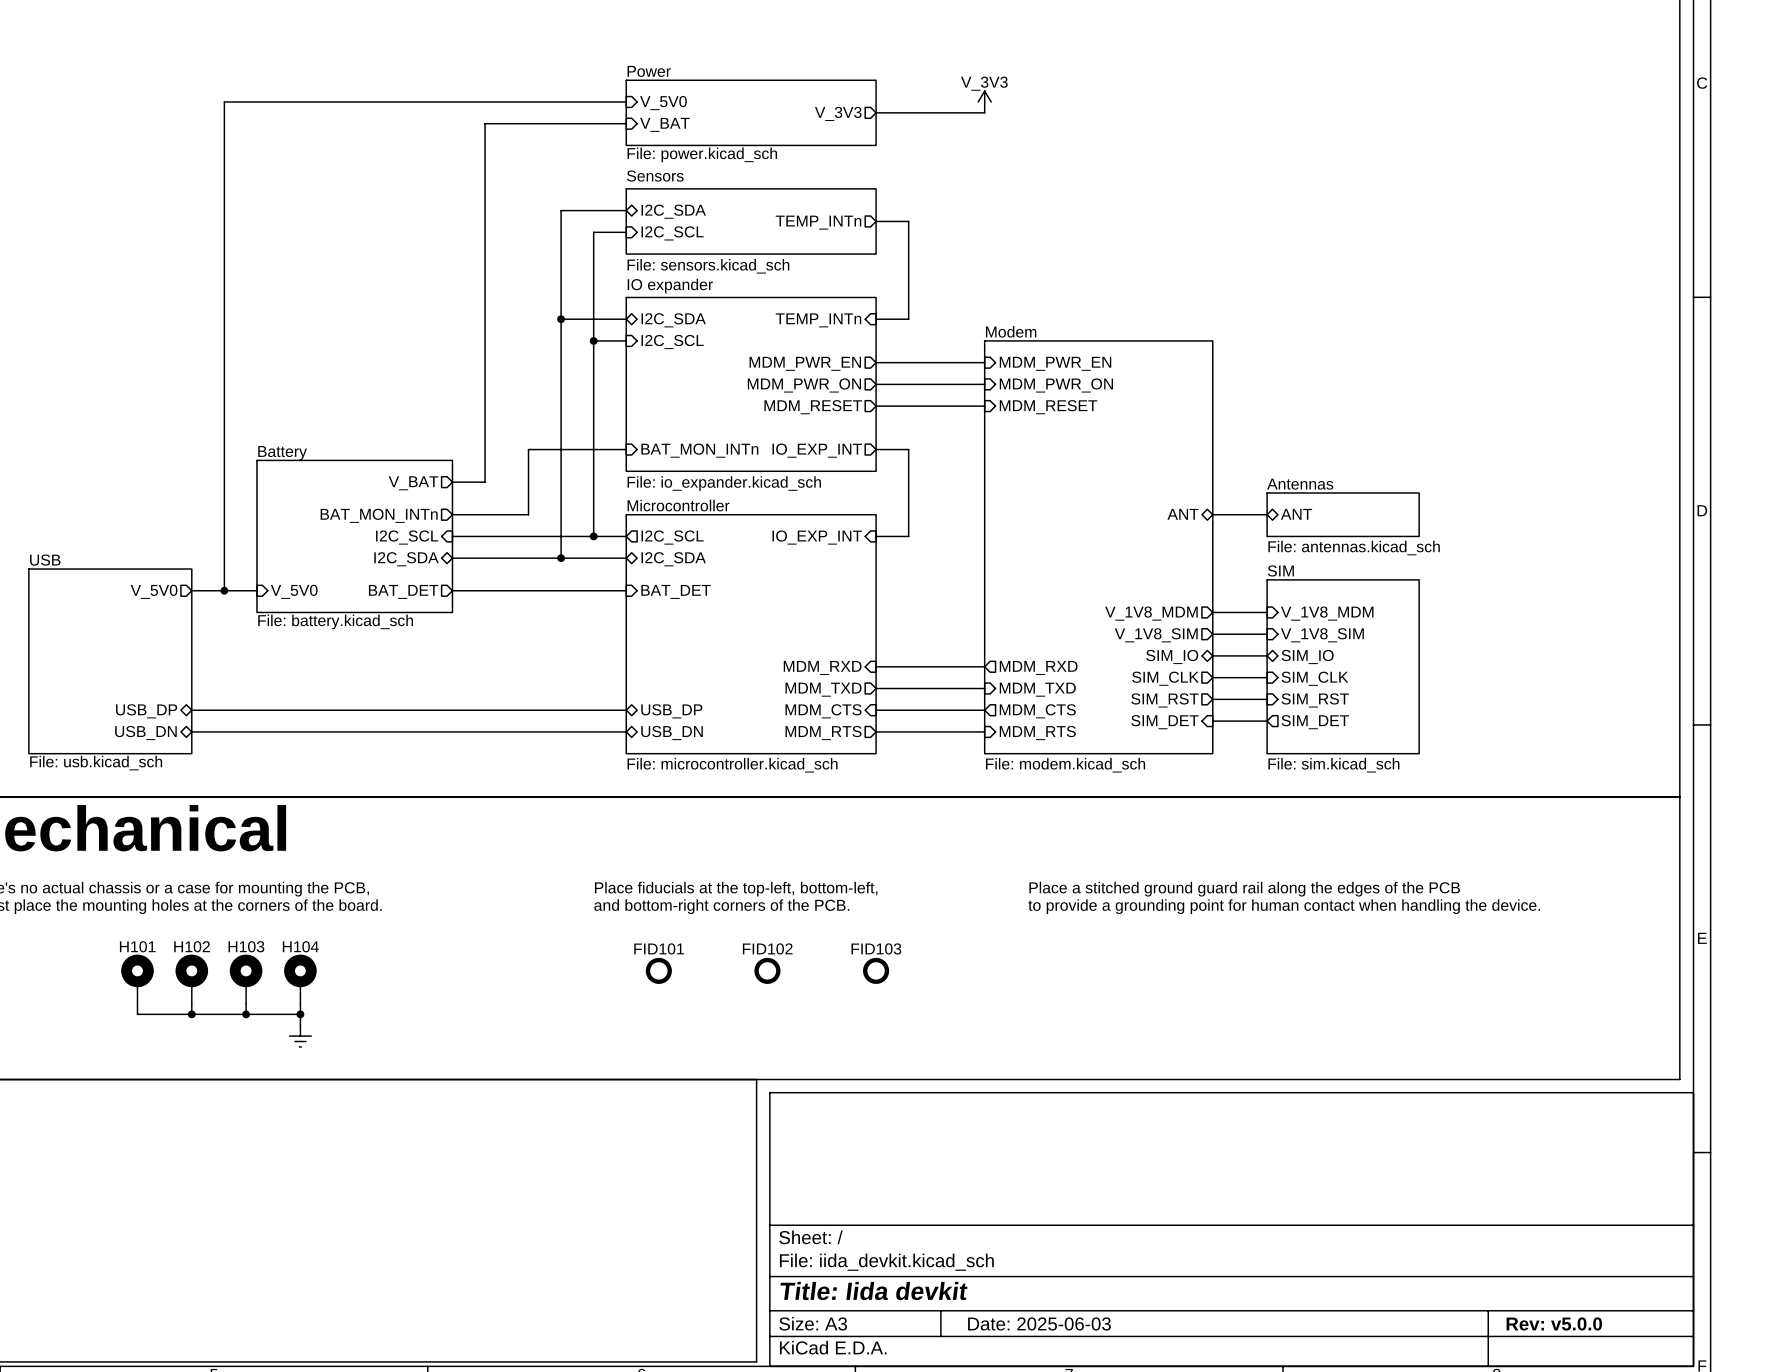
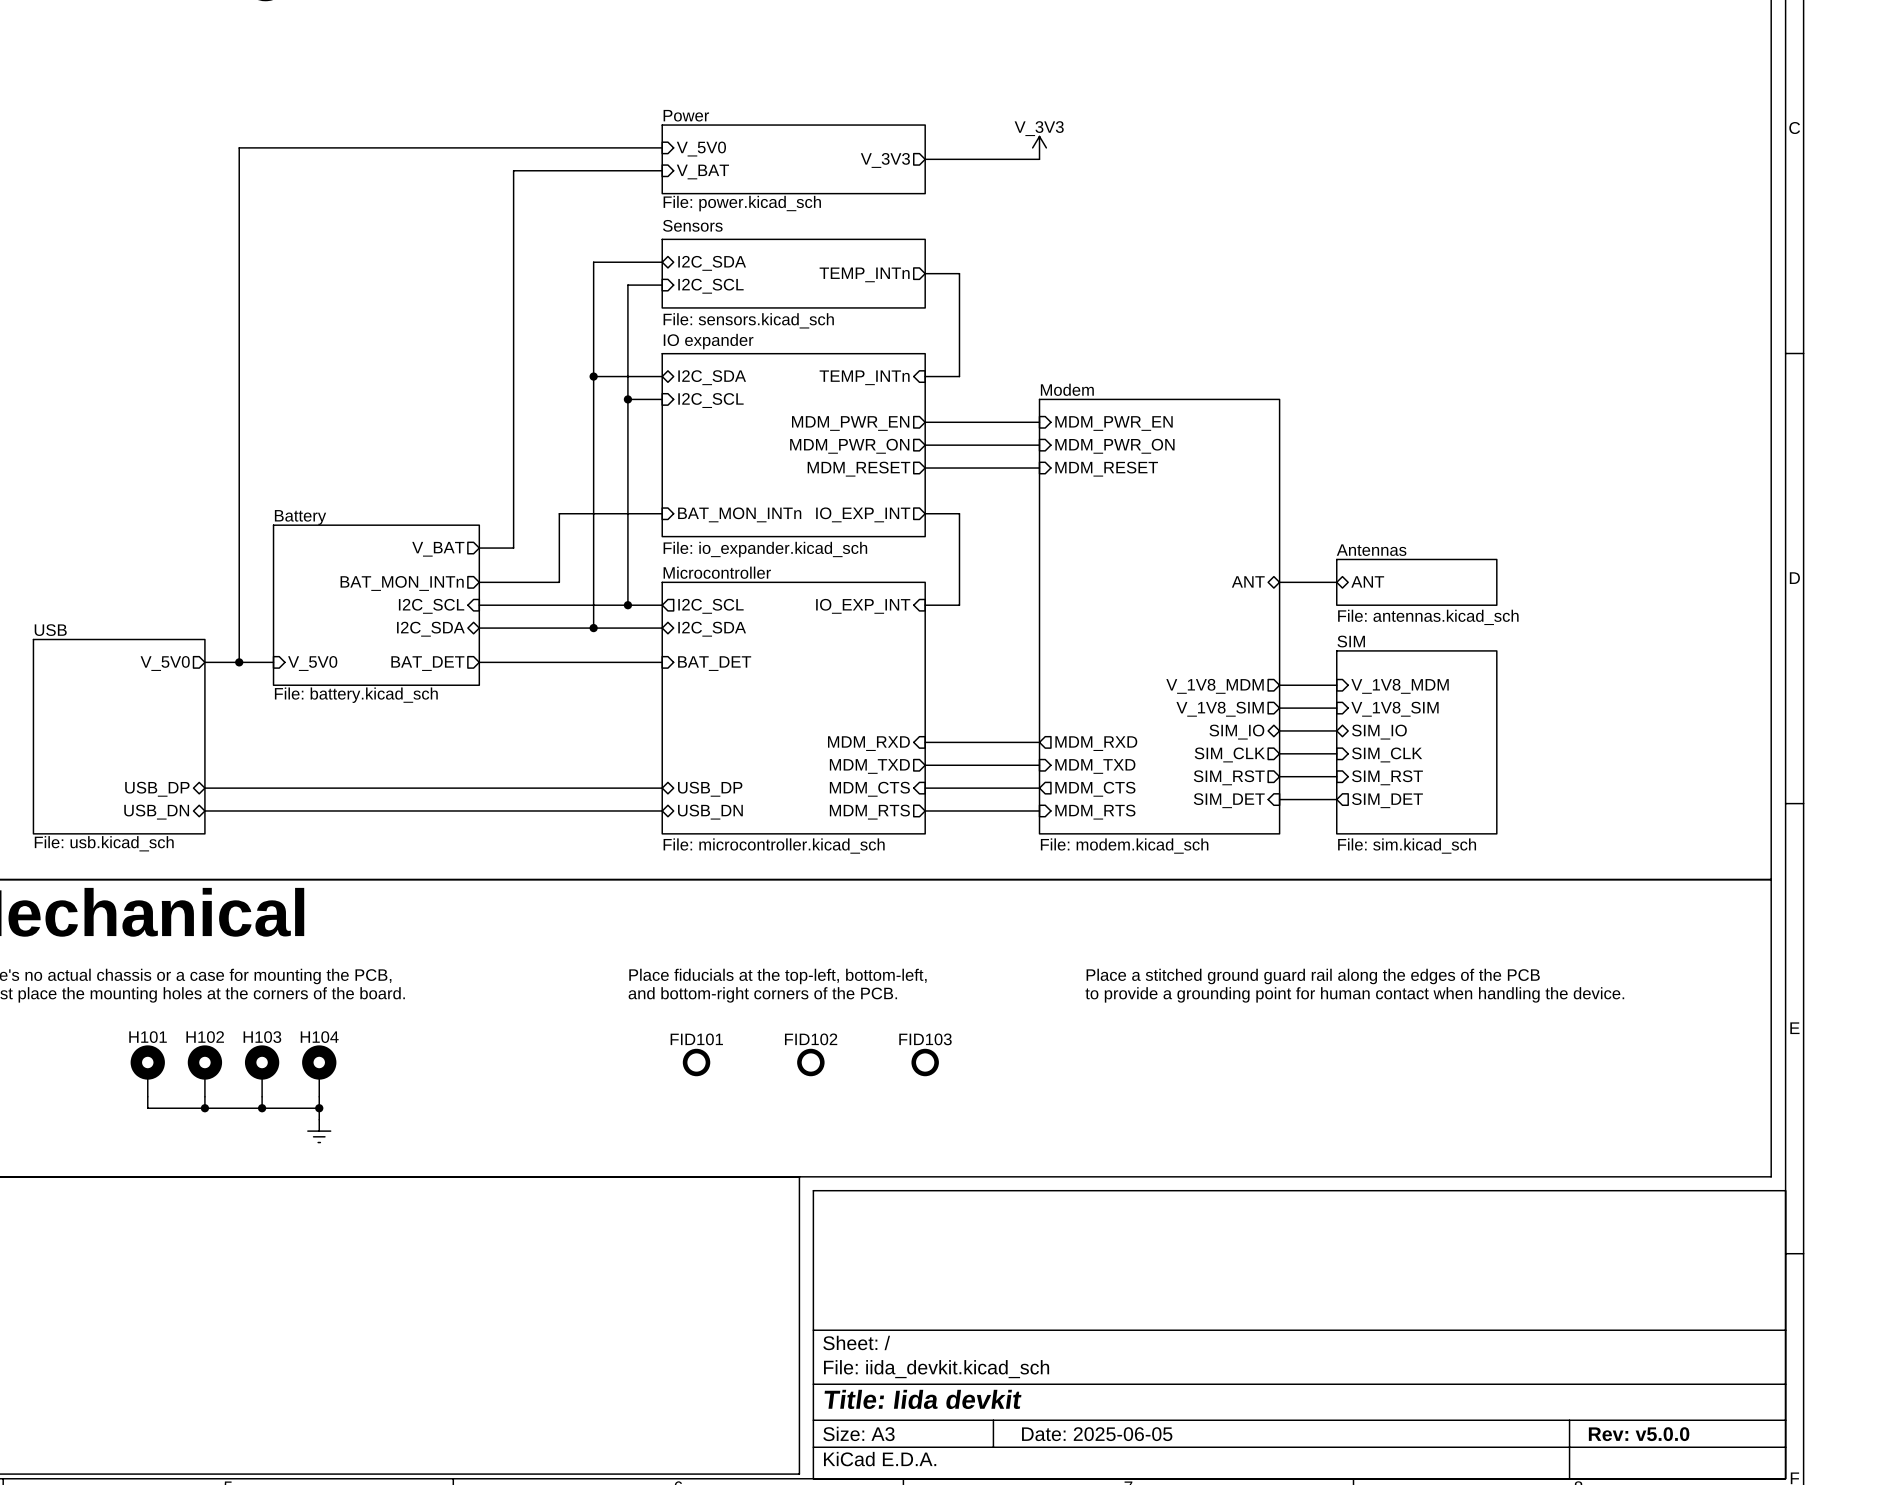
title block: Date: 2025-06-03 (1039, 1323) -> Date: 2025-06-05 (1097, 1434)

